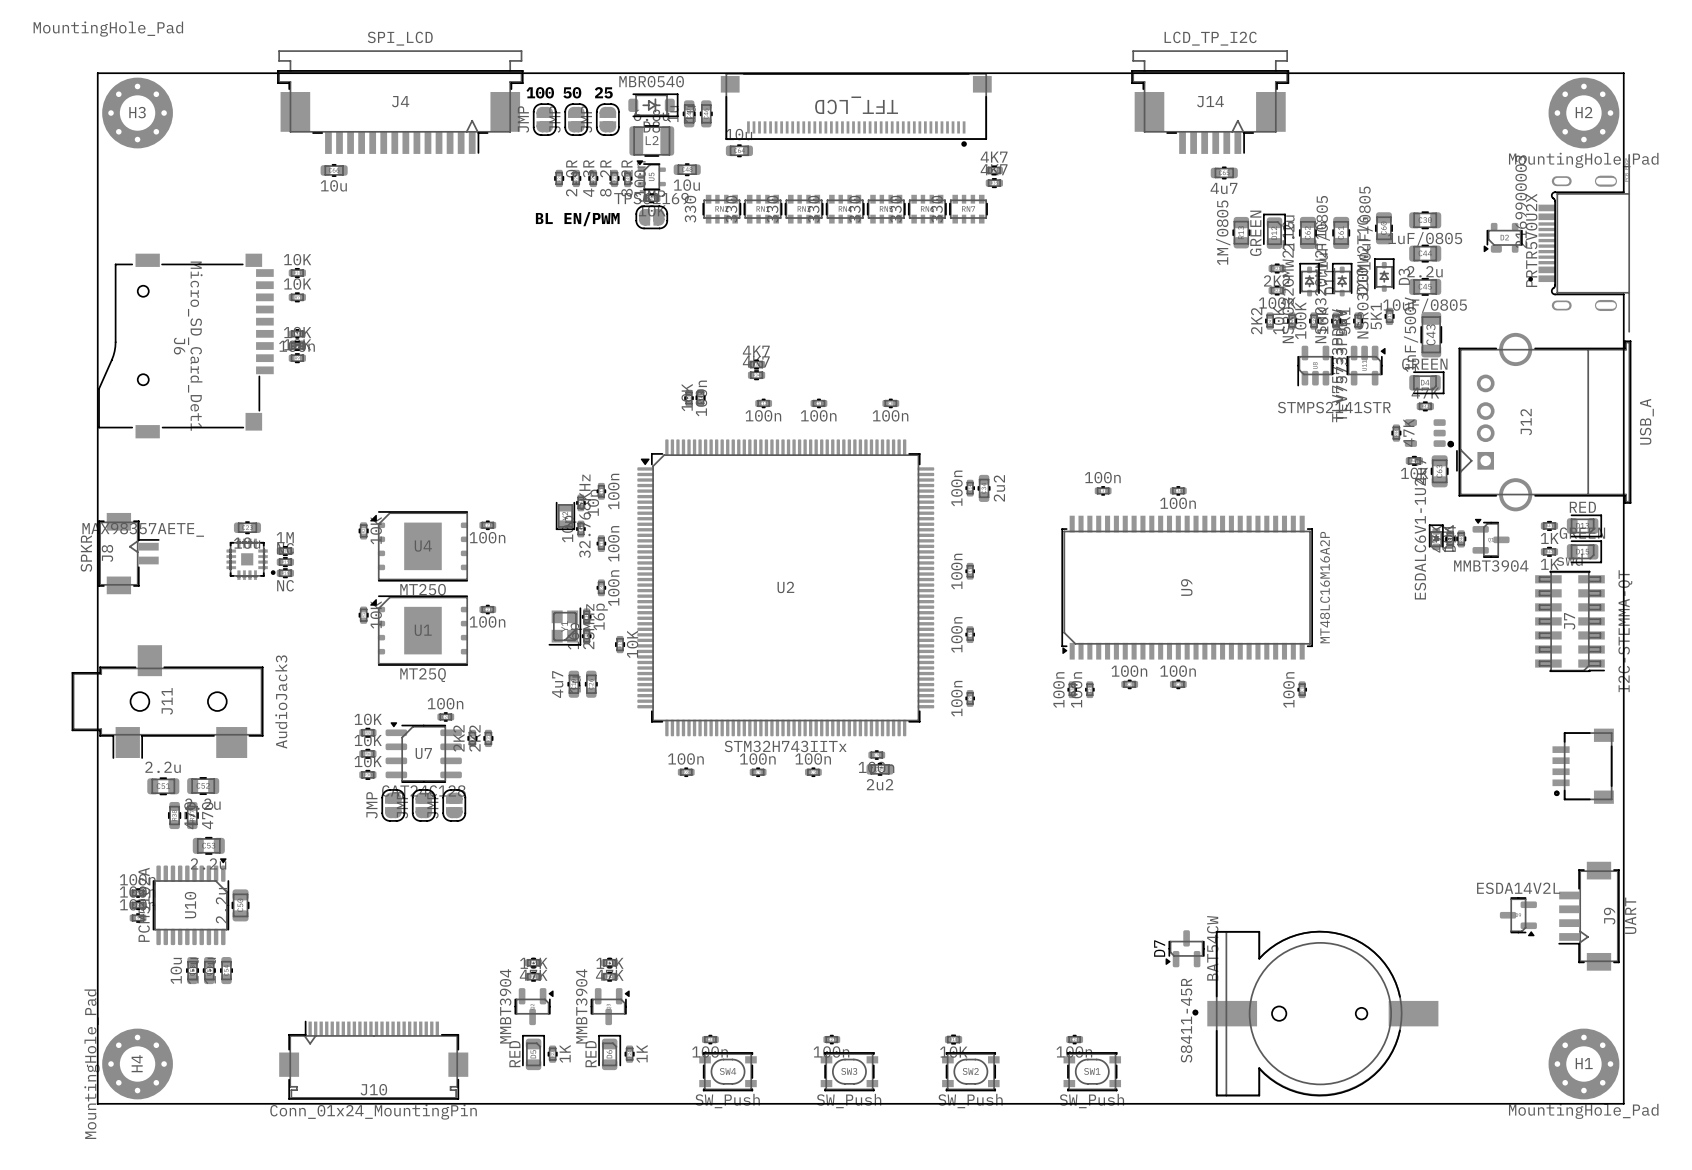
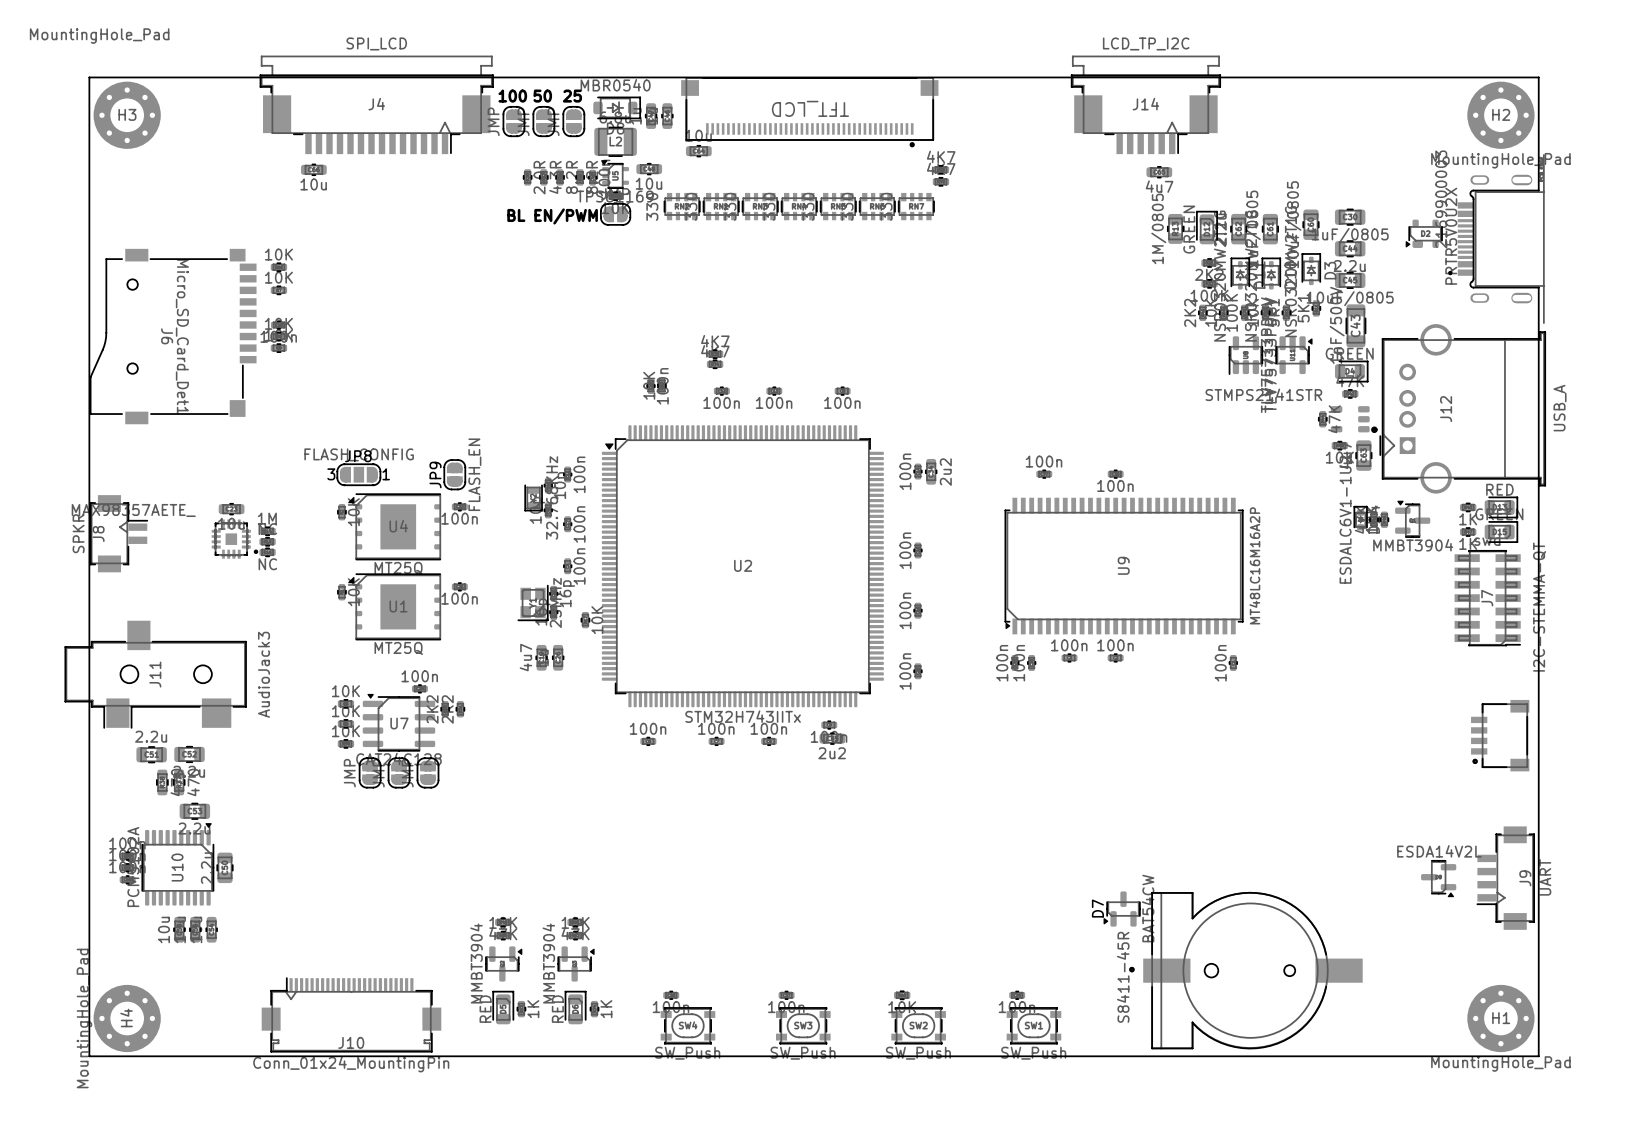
JP8: none -> FLASH_CONFIG (358, 474)
JP9: none -> FLASH_EN (454, 474)

